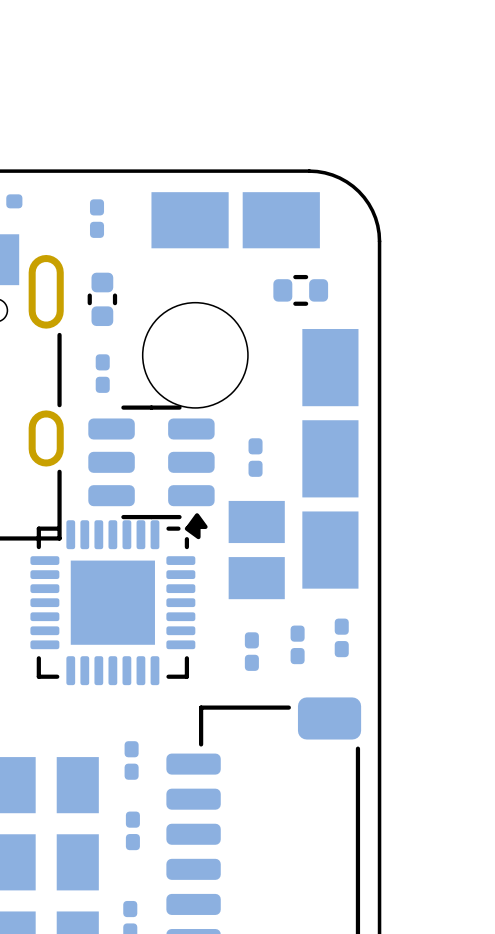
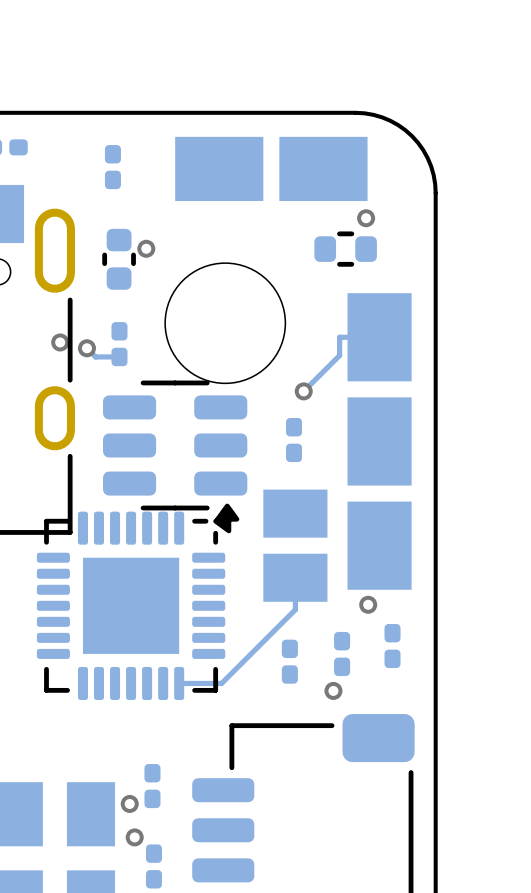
via: none -> (366, 218)
via: none -> (146, 248)
track: none -> (379, 337) (339, 337) (339, 355) (303, 391)
via: none -> (60, 342)
track: none -> (86, 348) (95, 356) (119, 356)
via: none -> (86, 348)
via: none -> (303, 391)
track: none -> (295, 577) (295, 609) (221, 683) (179, 683)
via: none -> (368, 604)
via: none -> (333, 690)
via: none -> (129, 803)
via: none -> (134, 837)

